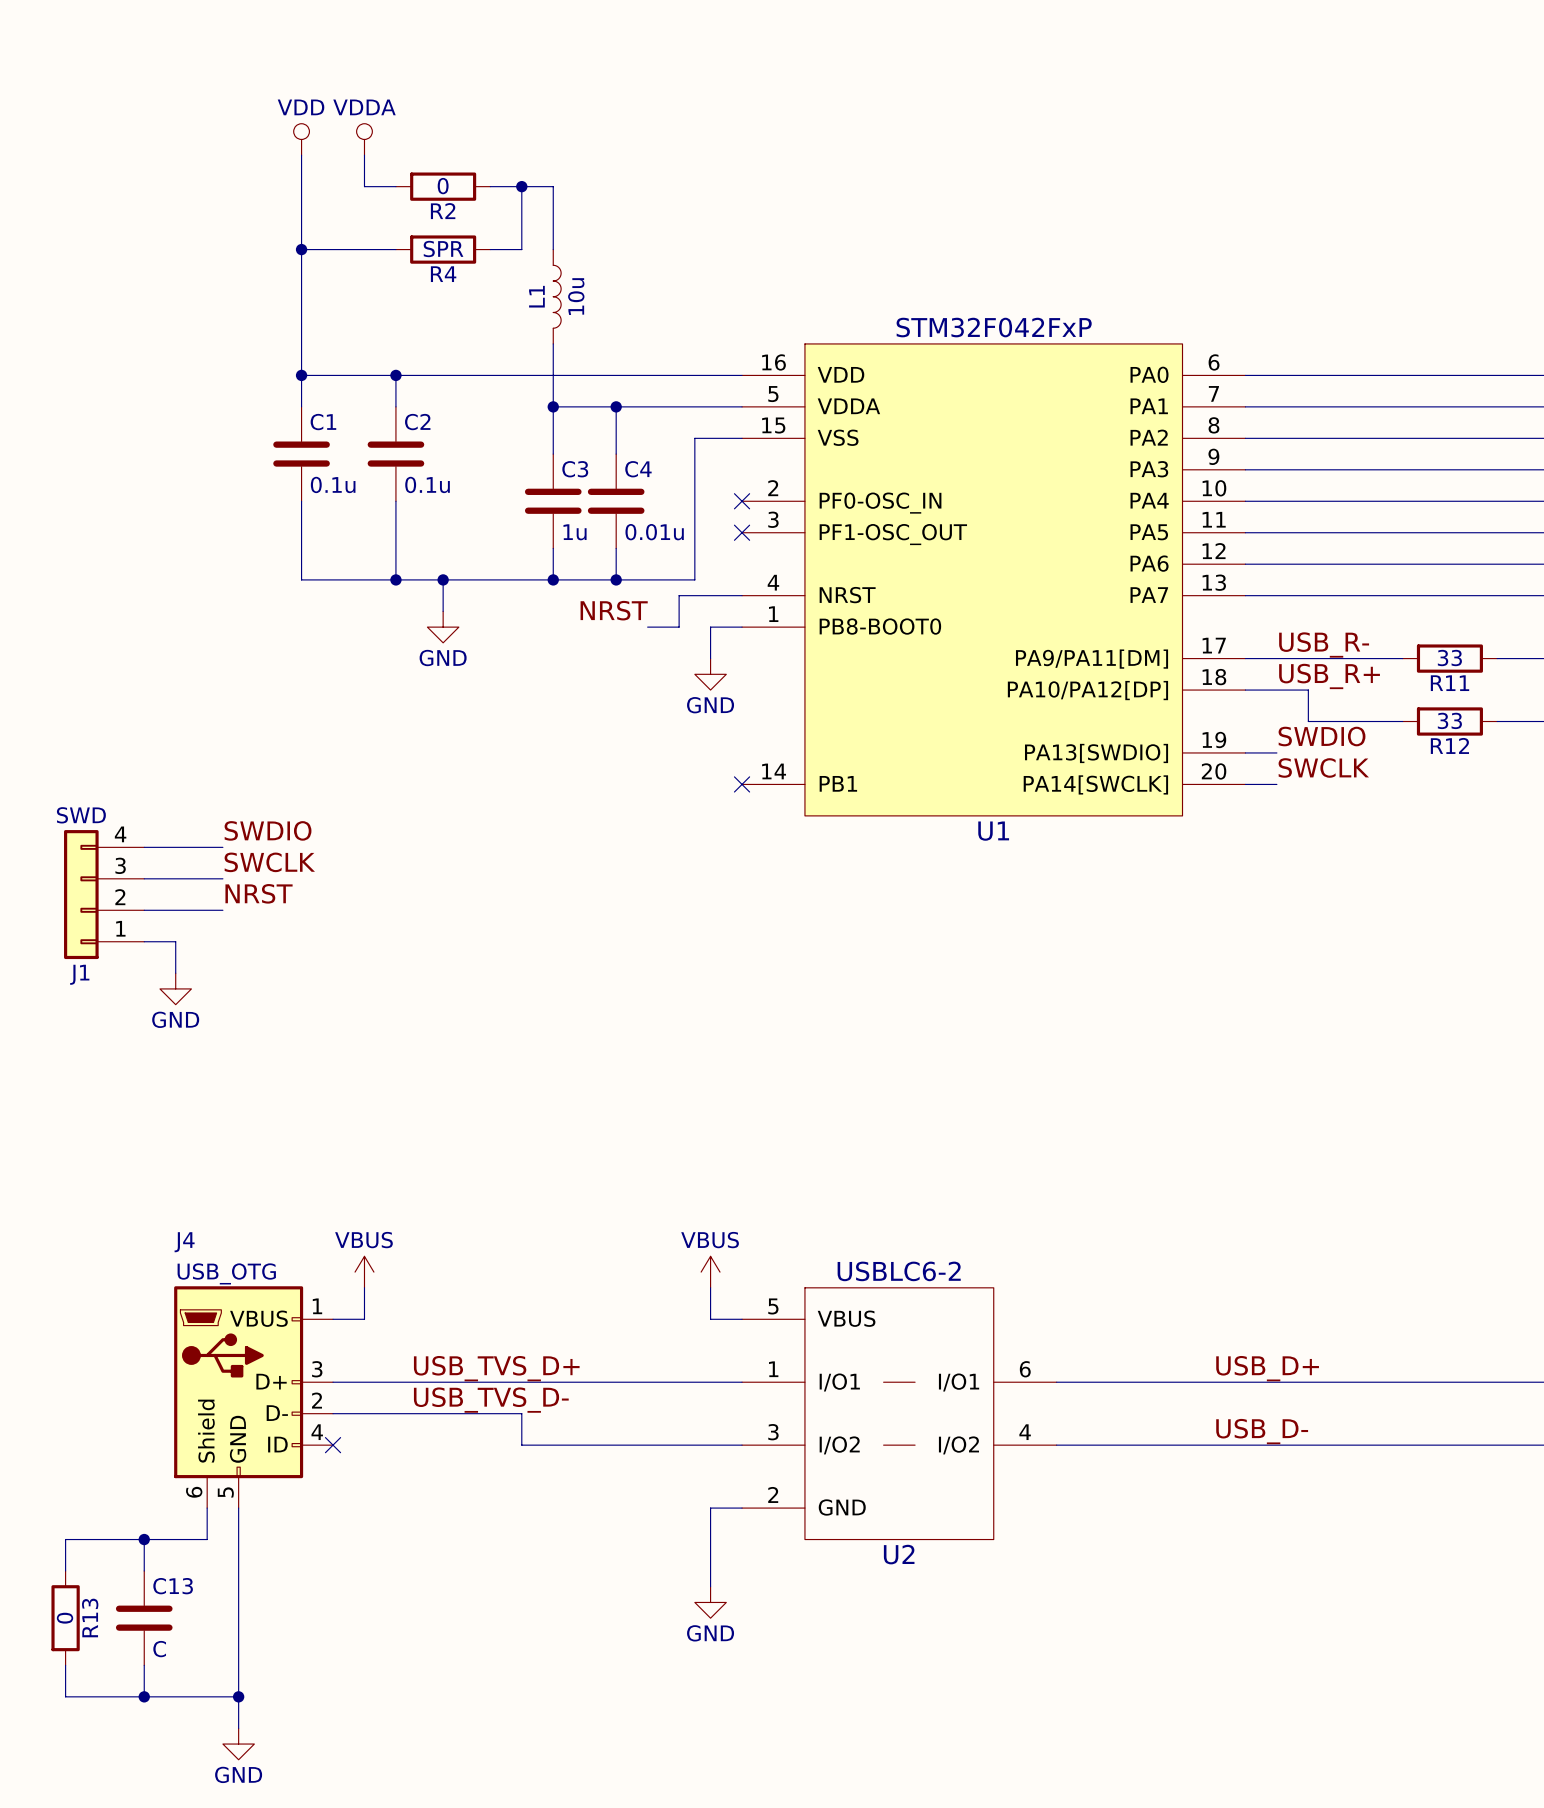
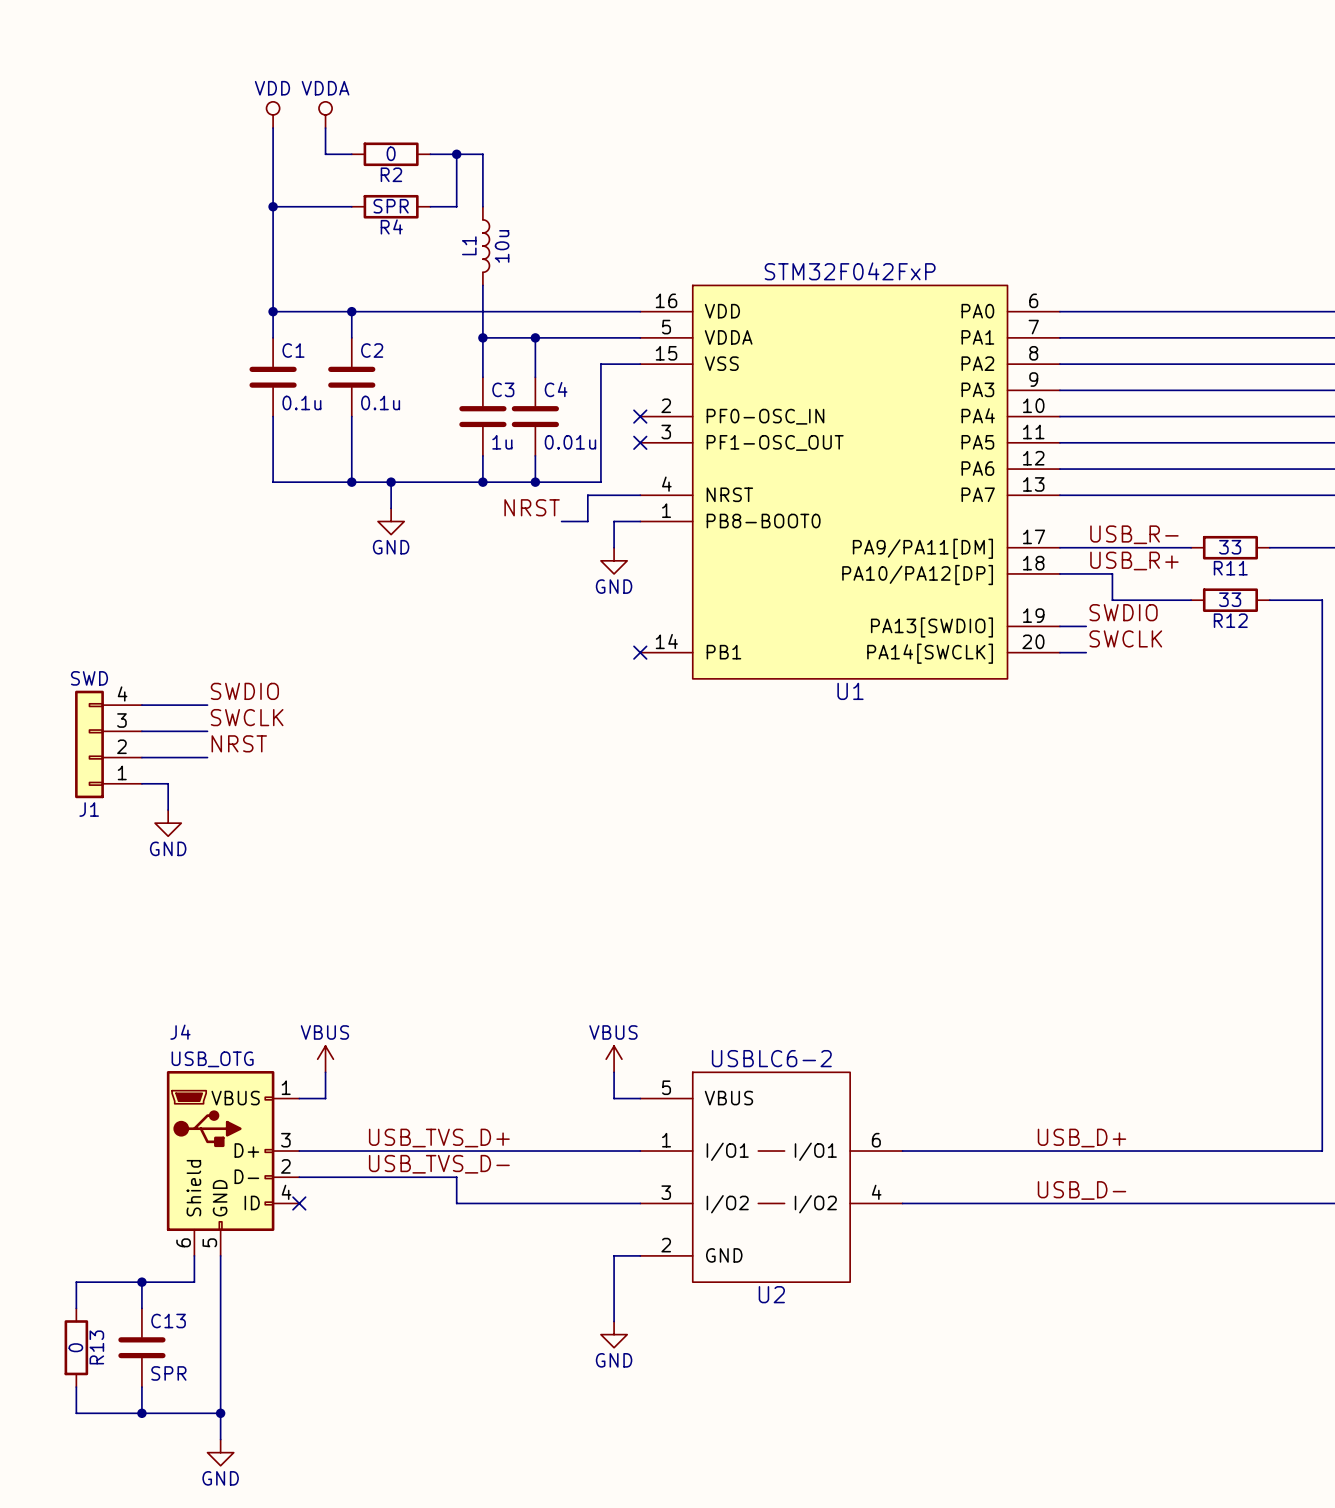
C13 value: C (159, 1649) -> SPR (168, 1373)

